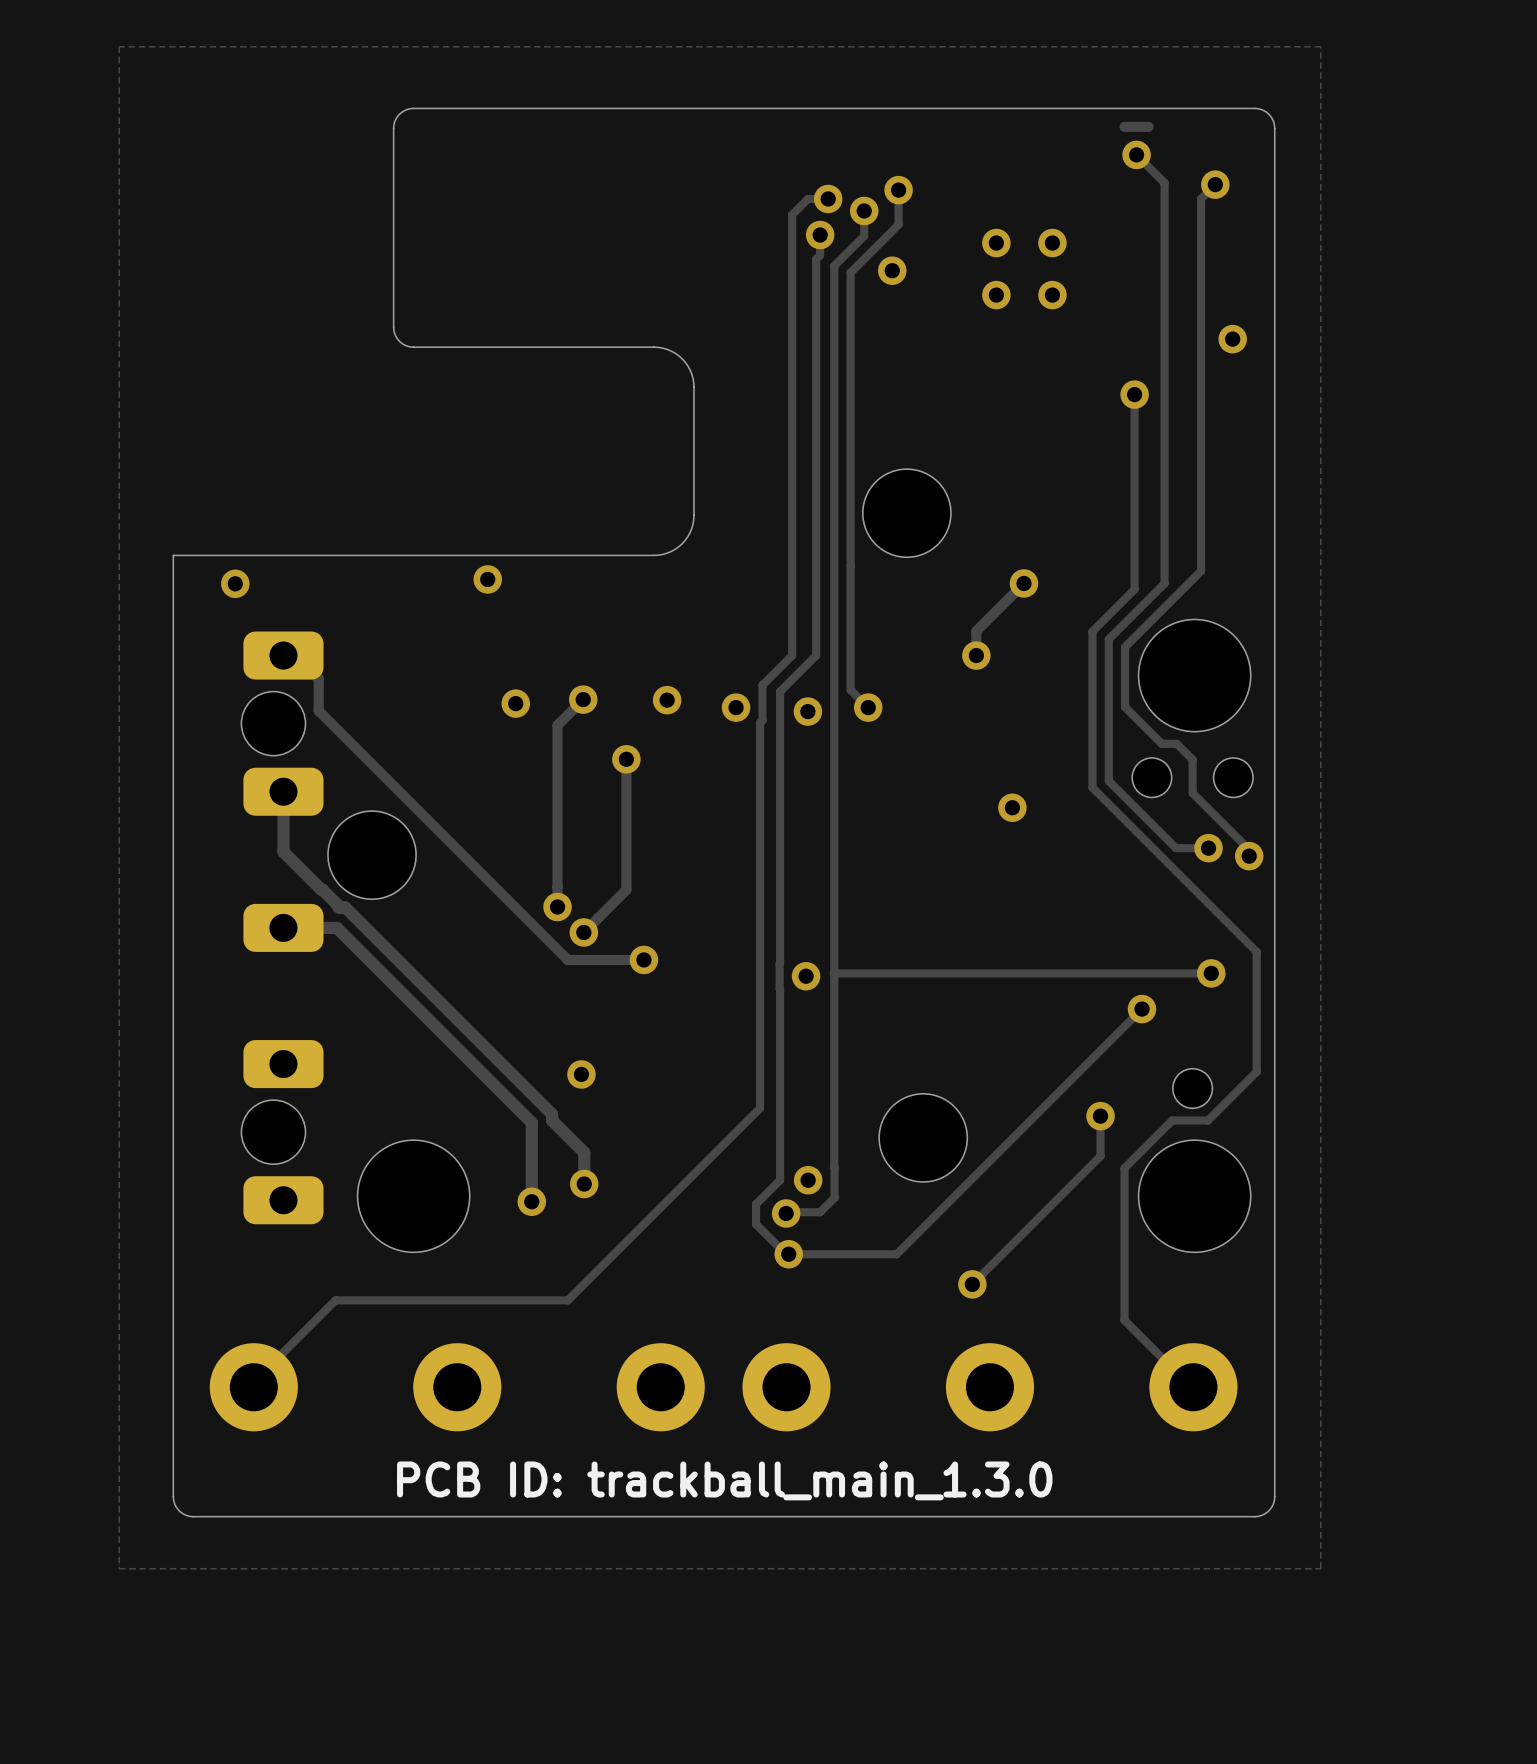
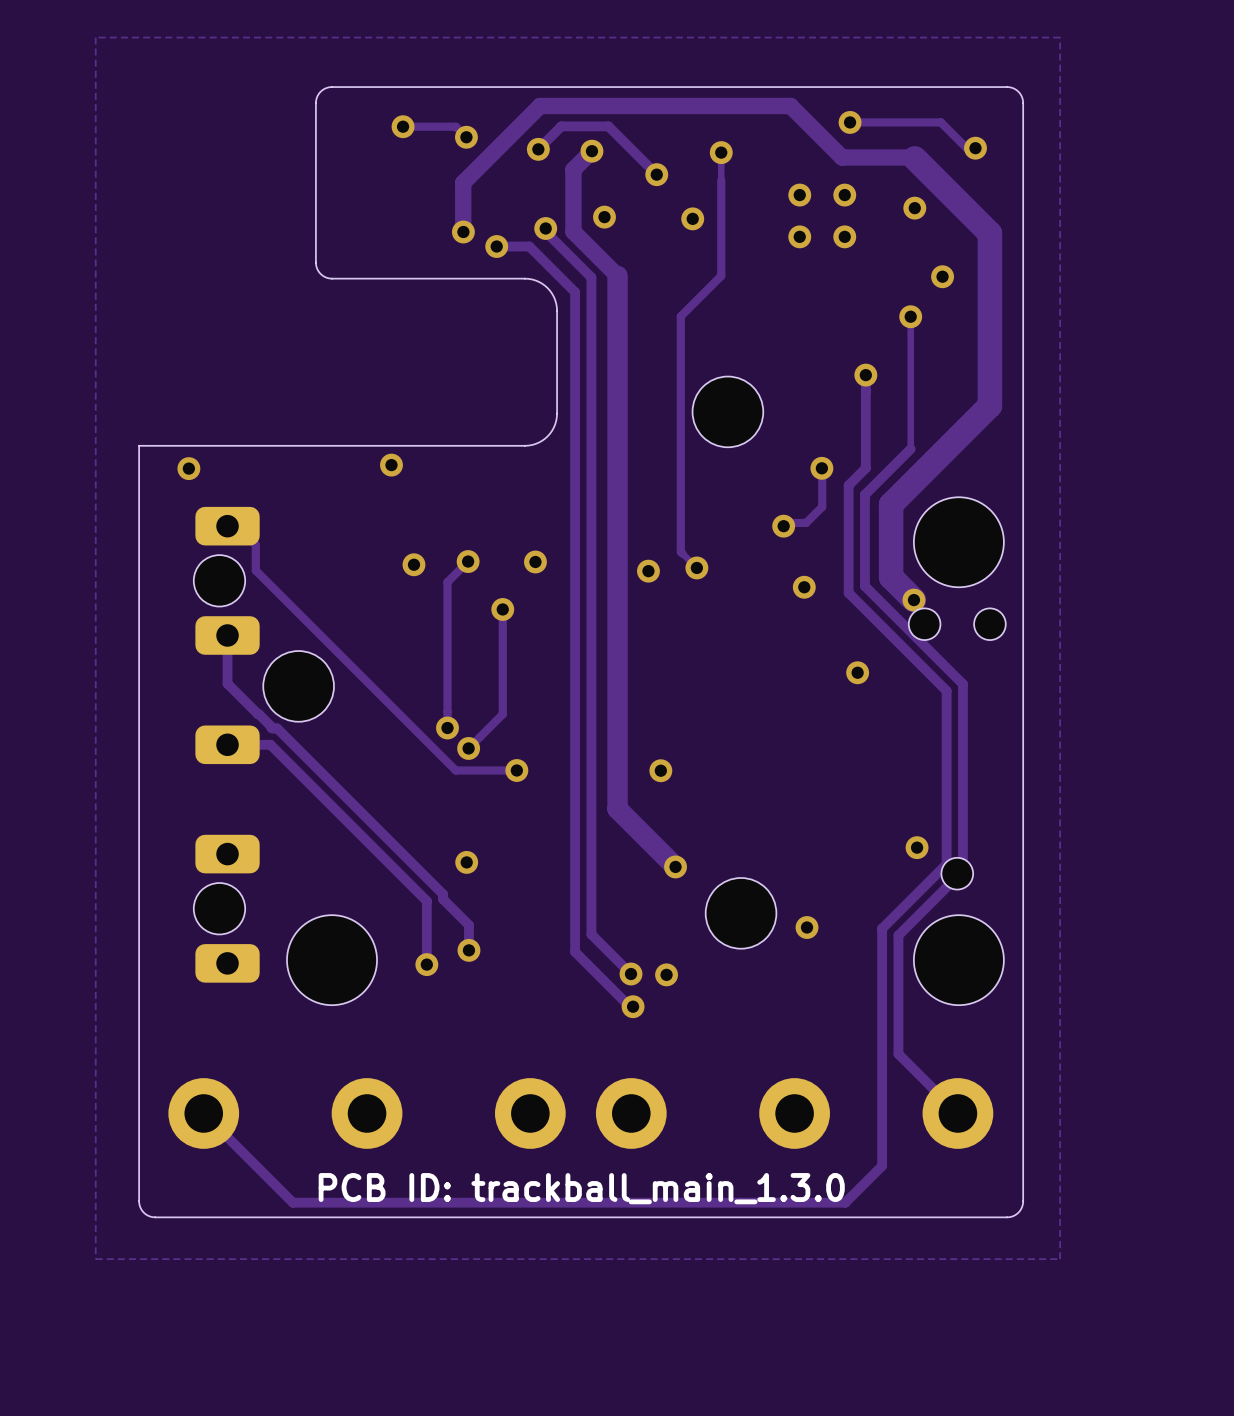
track: (1148, 126) (1124, 126) -> none
track: none -> (850, 122) (940, 122) (967, 148)
via: none -> (850, 122)
track: (1136, 154) (1164, 182) (1164, 583) (1108, 639) (1108, 780) (1175, 848) (1208, 848) -> none
via: (1136, 154) -> none
track: none -> (403, 126) (455, 126) (466, 137)
via: none -> (403, 126)
via: none -> (466, 137)
track: (1215, 184) (1201, 198) (1201, 570) (1125, 647) (1125, 707) (1161, 743) (1176, 743) (1192, 759) (1192, 793) (1249, 849) (1249, 856) -> none
track: none -> (593, 148) (573, 169) (573, 231) (617, 275) (617, 808) (675, 866)
track: none -> (538, 149) (561, 126) (608, 126) (656, 174)
via: none -> (538, 149)
via: none -> (591, 151)
track: (828, 198) (808, 198) (792, 214) (792, 655) (762, 685) (762, 720) (760, 722) (760, 1108) (567, 1300) (335, 1300) (251, 1384) -> none
via: (828, 198) -> none
track: (864, 210) (864, 236) (834, 265) (834, 1167) -> none
via: (864, 210) -> none
via: none -> (656, 174)
track: (898, 224) (850, 272) (850, 690) -> (721, 180) (721, 275) (680, 316) (680, 551) (682, 553)
track: (820, 235) (820, 255) (816, 259) (816, 655) (780, 691) (780, 963) -> none
via: (820, 235) -> none
via: none -> (914, 208)
via: none -> (604, 217)
via: (892, 270) -> none
via: none -> (692, 218)
track: none -> (545, 228) (545, 231) (591, 277) (591, 934) (631, 974)
via: none -> (545, 228)
track: none -> (463, 231) (463, 182) (540, 105) (790, 105) (842, 157) (913, 157) (989, 233) (989, 405) (891, 504) (891, 577) (913, 600)
via: none -> (463, 232)
via: none -> (496, 246)
via position: (1232, 339) -> (942, 276)
track: none -> (865, 375) (865, 468) (848, 485) (848, 592) (946, 690) (946, 864) (882, 928) (882, 1165) (845, 1202) (292, 1202) (203, 1113)
via: none -> (865, 375)
track: (1134, 559) (1134, 589) (1092, 631) (1092, 787) (1256, 951) (1256, 1071) (1207, 1120) (1172, 1120) (1124, 1168) (1124, 1320) (1192, 1388) -> (910, 449) (864, 494) (864, 586) (962, 684) (962, 870) (898, 935) (898, 1054) (957, 1113)
track: (1023, 583) (976, 631) (976, 651) -> (822, 468) (822, 506) (806, 522) (783, 522)
via: (736, 707) -> none
via: none -> (804, 587)
via: none -> (913, 600)
via: (1012, 807) -> none
via: none -> (857, 672)
via: (1208, 848) -> none
via: (1249, 856) -> none
track: (779, 963) (779, 988) -> none
track: (1211, 973) (833, 973) -> none
via: (1211, 973) -> none
via position: (806, 976) -> (660, 770)
track: (780, 989) (780, 1180) (756, 1204) (756, 1224) (788, 1256) -> none
track: (1141, 1009) (896, 1254) (788, 1254) -> (496, 246) (529, 246) (575, 292) (575, 951) (629, 1006) (633, 1006)
via: (1141, 1009) -> none
via: none -> (917, 847)
via: none -> (675, 866)
track: (1100, 1116) (1100, 1156) (972, 1284) -> none
via: (1100, 1116) -> none
via: none -> (807, 927)
track: (834, 1167) (834, 1197) (820, 1212) (788, 1212) -> none
via position: (808, 1180) -> (666, 974)
via: (972, 1284) -> none

